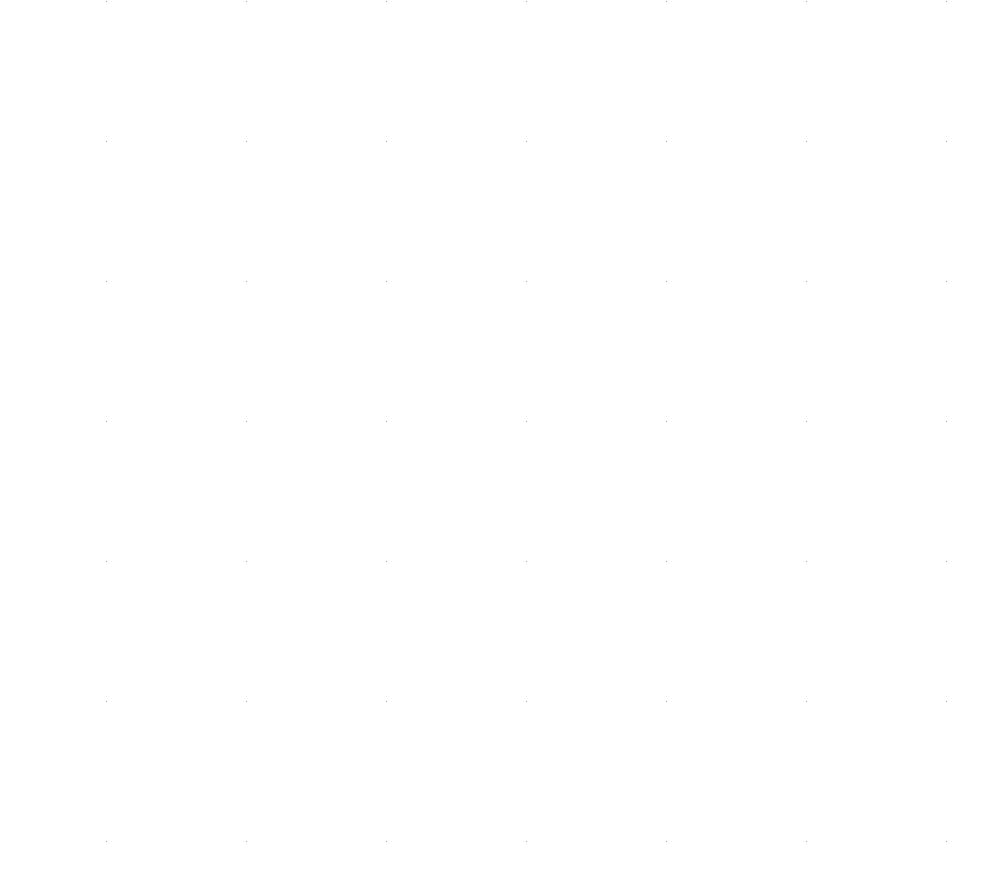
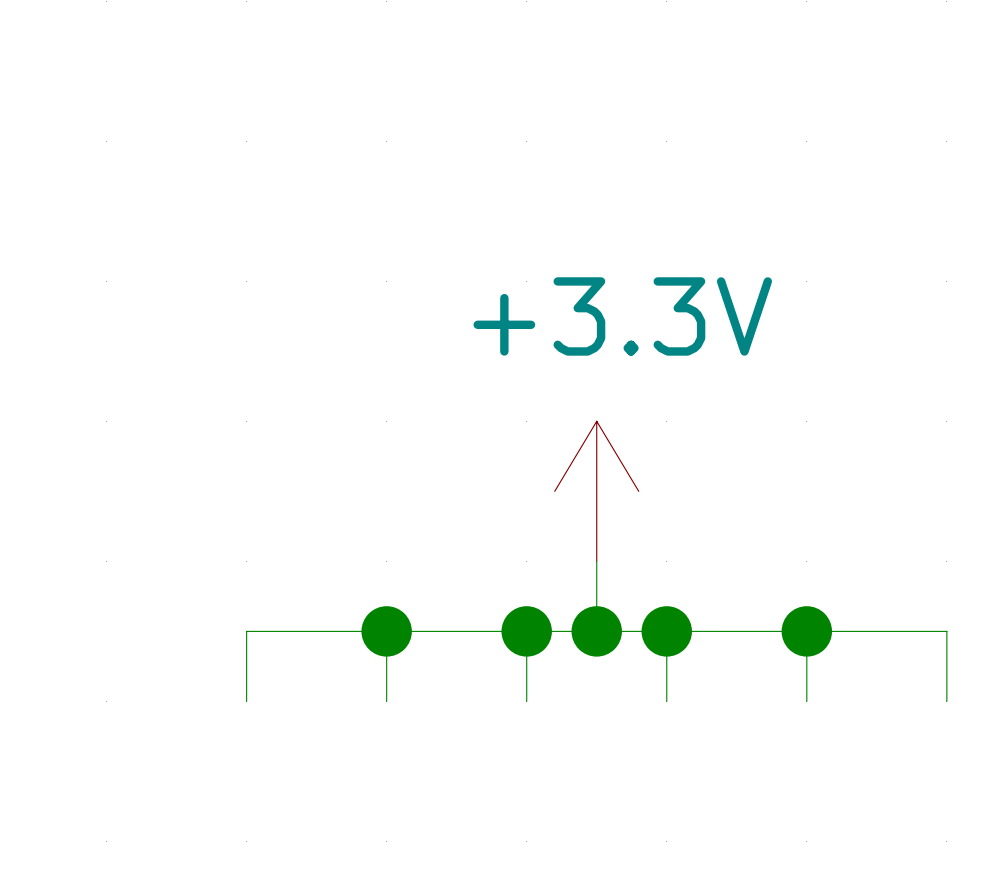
power symbol: none -> +3.3V (596, 491)
wire: none -> (596, 561) (596, 631)
wire: none -> (386, 631) (386, 701)
junction: none -> (386, 631)
wire: none -> (526, 631) (526, 701)
junction: none -> (526, 631)
junction: none -> (596, 631)
wire: none -> (666, 631) (666, 701)
junction: none -> (666, 631)
wire: none -> (806, 631) (806, 701)
junction: none -> (806, 631)
wire: none -> (246, 701) (246, 631) (946, 631) (946, 701)

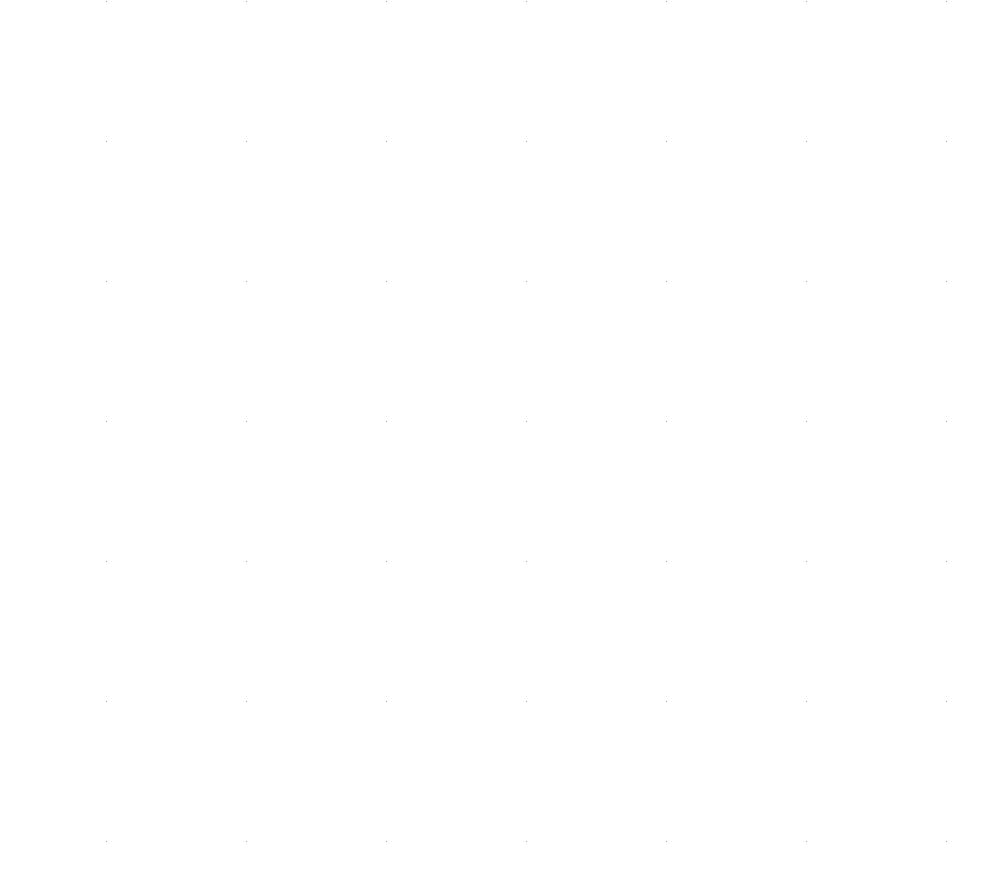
power symbol: +3.3V (596, 491) -> none
wire: (596, 561) (596, 631) -> none
wire: (386, 631) (386, 701) -> none
junction: (386, 631) -> none
wire: (526, 631) (526, 701) -> none
junction: (526, 631) -> none
junction: (596, 631) -> none
wire: (666, 631) (666, 701) -> none
junction: (666, 631) -> none
wire: (806, 631) (806, 701) -> none
junction: (806, 631) -> none
wire: (246, 701) (246, 631) (946, 631) (946, 701) -> none

